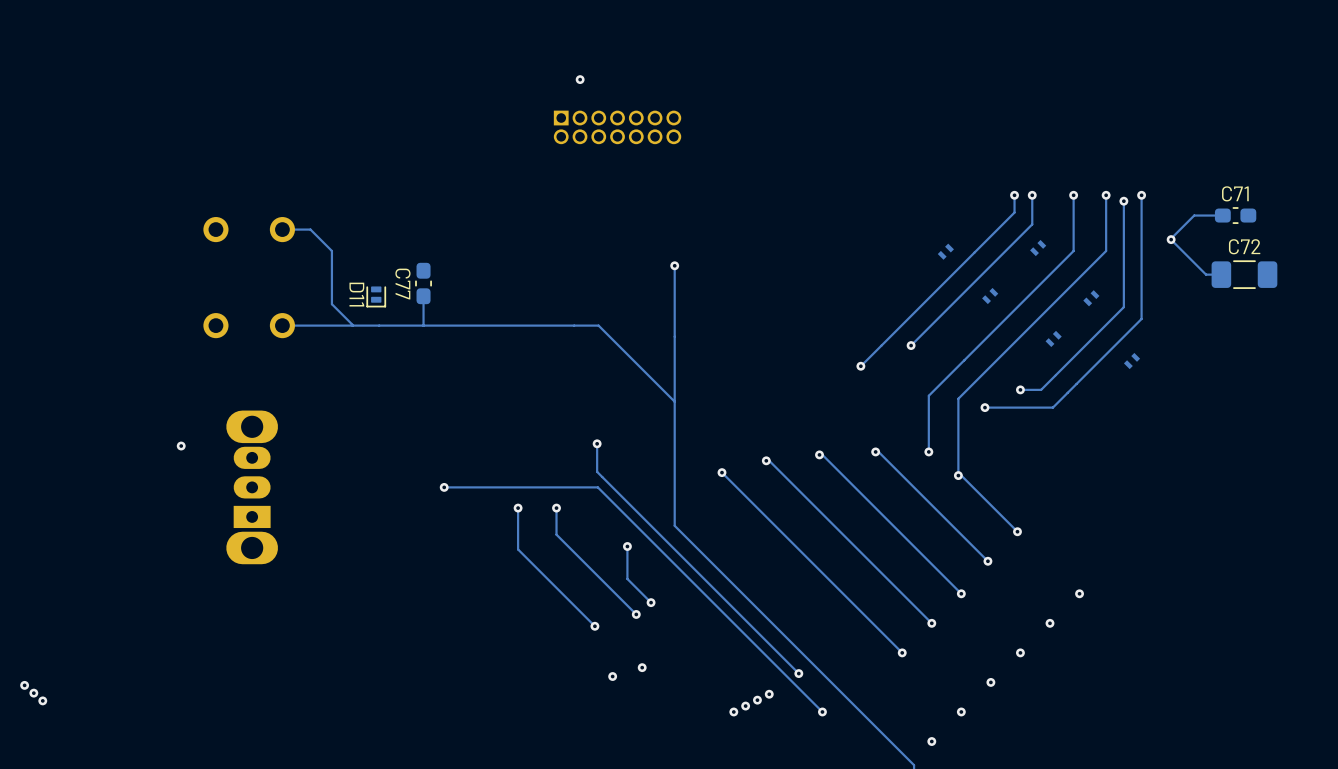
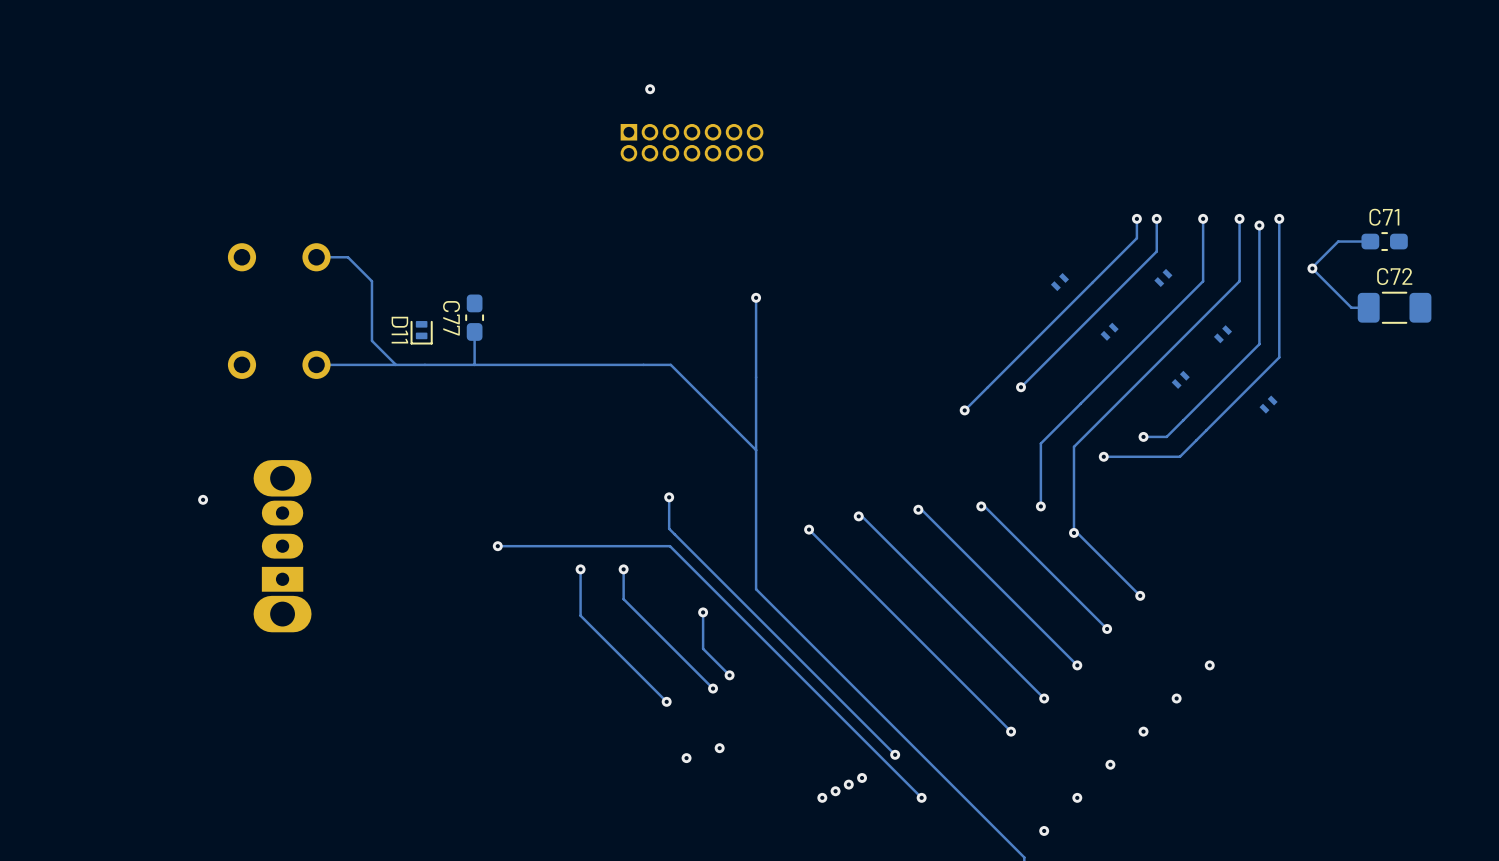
via: (24, 685) -> none
via: (33, 693) -> none
via: (42, 700) -> none

